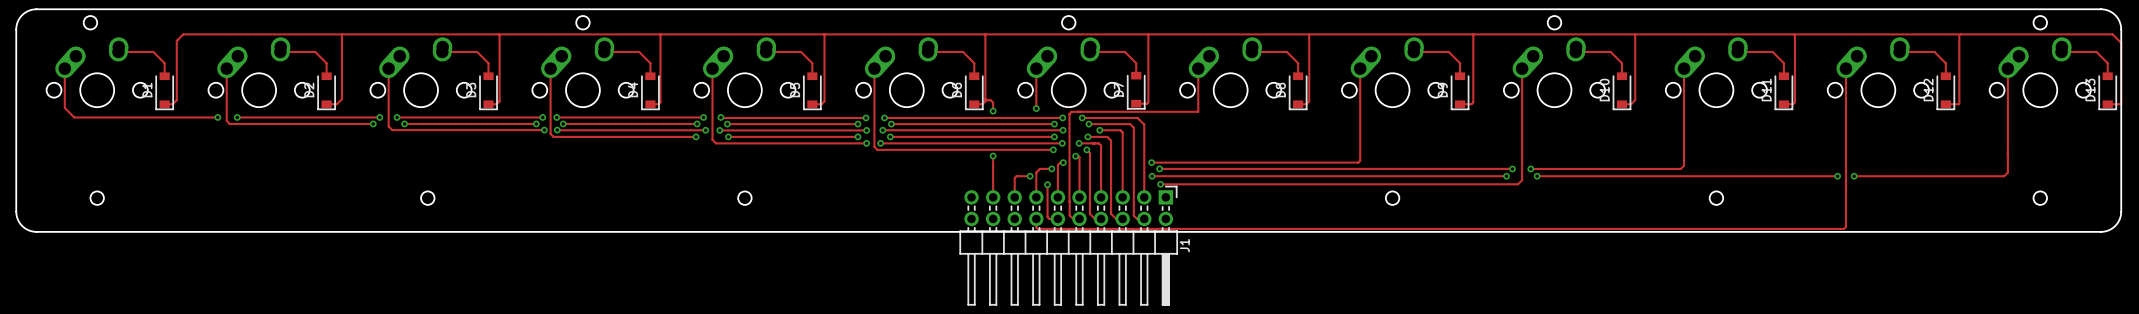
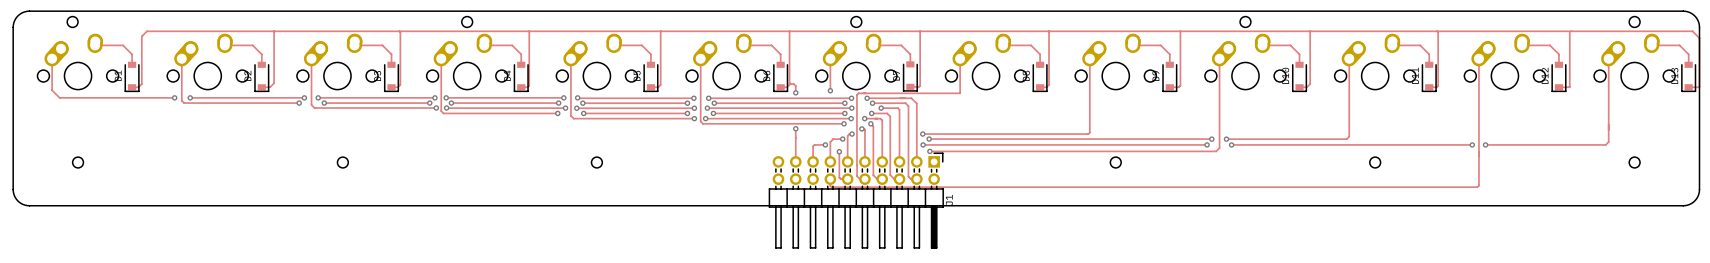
board edge: (16, 211) (17, 219) (22, 225) (28, 230) (36, 231) (2101, 231) (2108, 230) (2115, 225) (2119, 219) (2121, 211) -> (13, 173) (15, 197) (21, 203) (29, 205) (1683, 205) (1691, 203) (1697, 197) (1699, 173)

